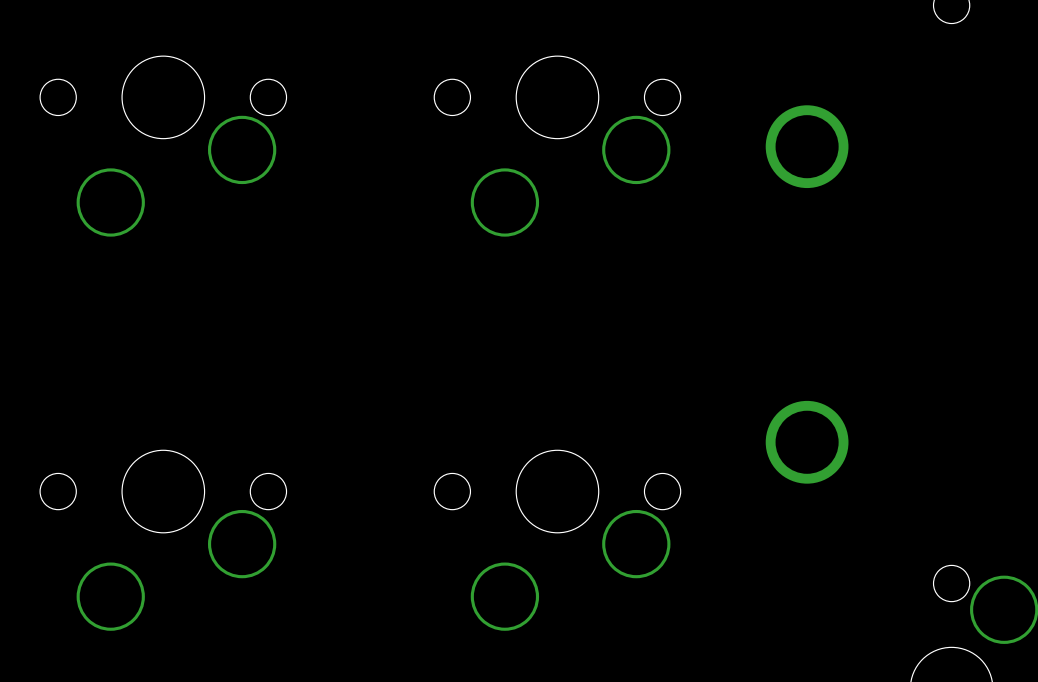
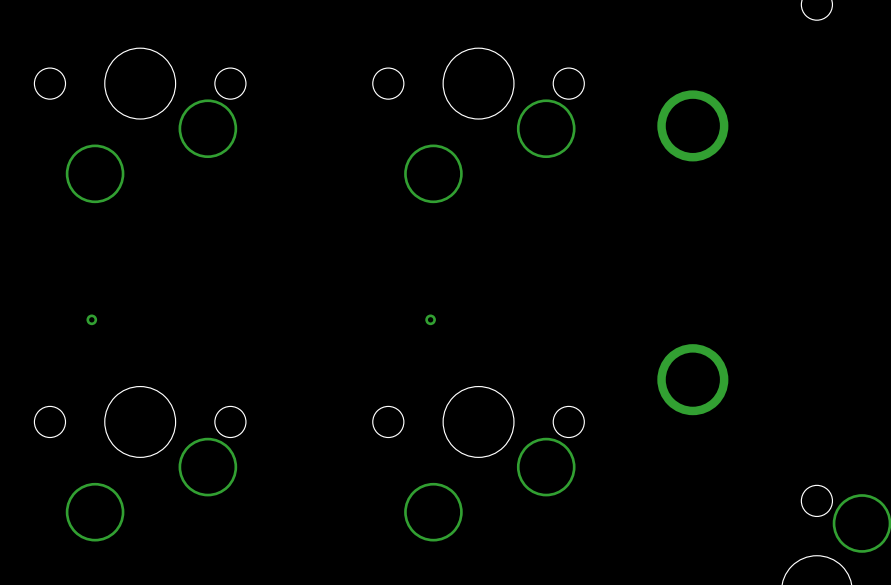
via: none -> (91, 319)
via: none -> (430, 319)

